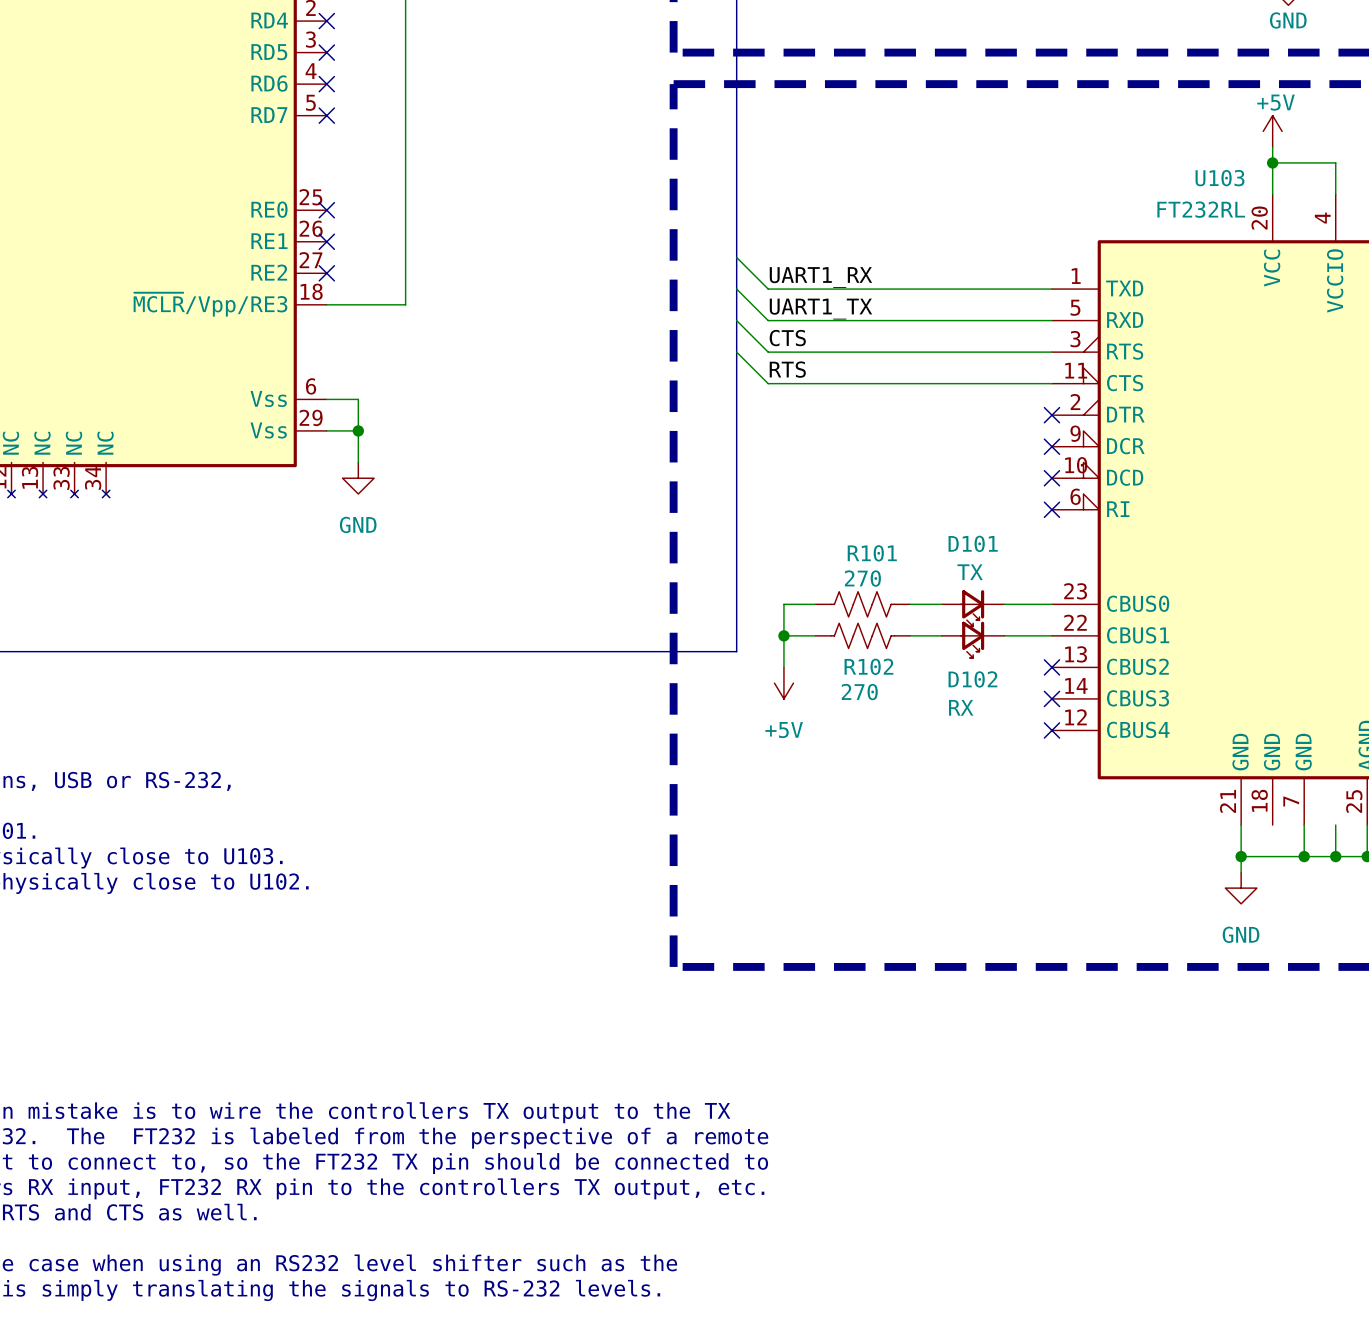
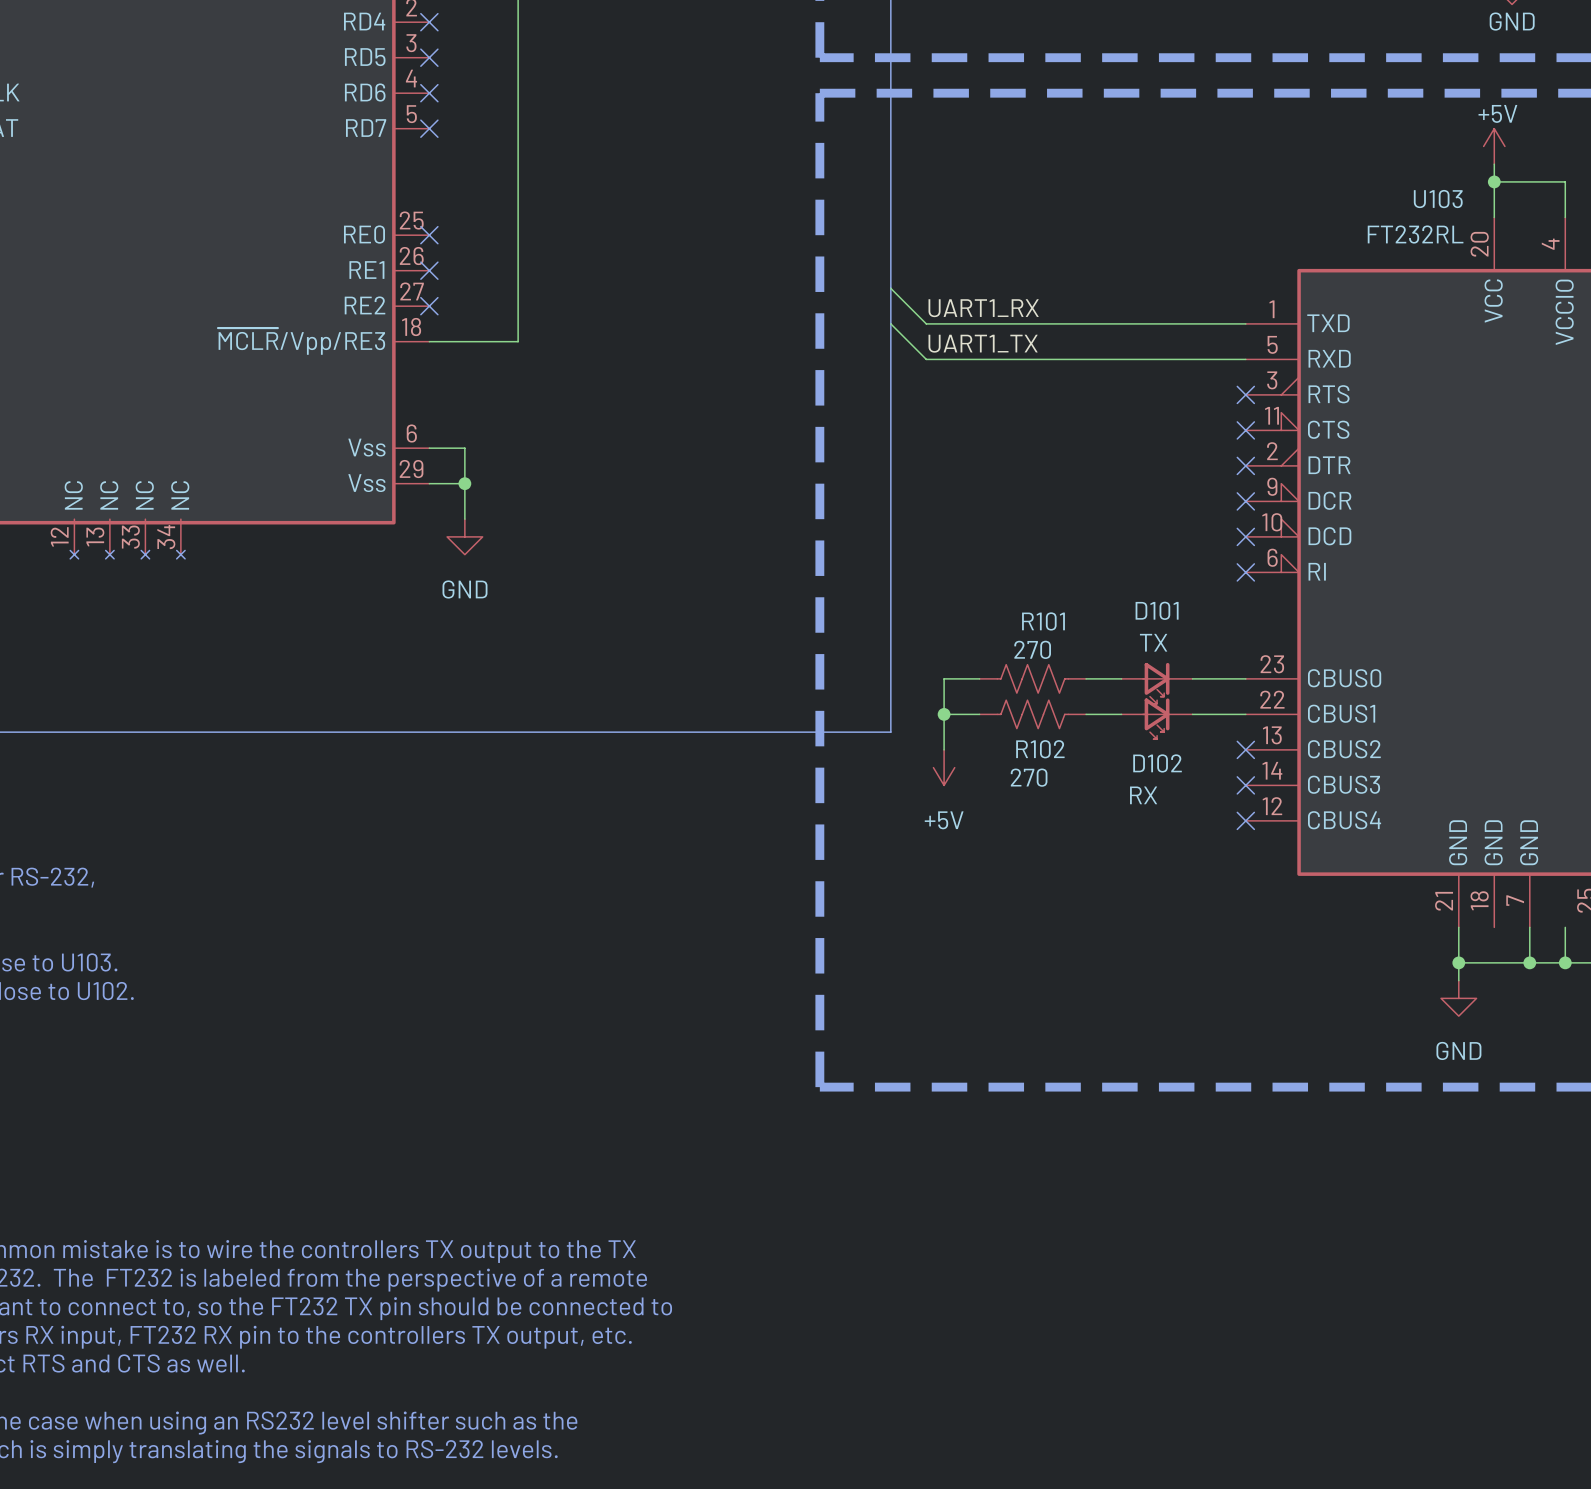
wire: (736, 320) (768, 352) (1051, 352) -> none
label: CTS (787, 338) -> none
wire: (736, 352) (768, 383) (1051, 383) -> none
no-connect mark: none -> (1245, 394)
label: RTS (787, 369) -> none
no-connect mark: none -> (1245, 430)

